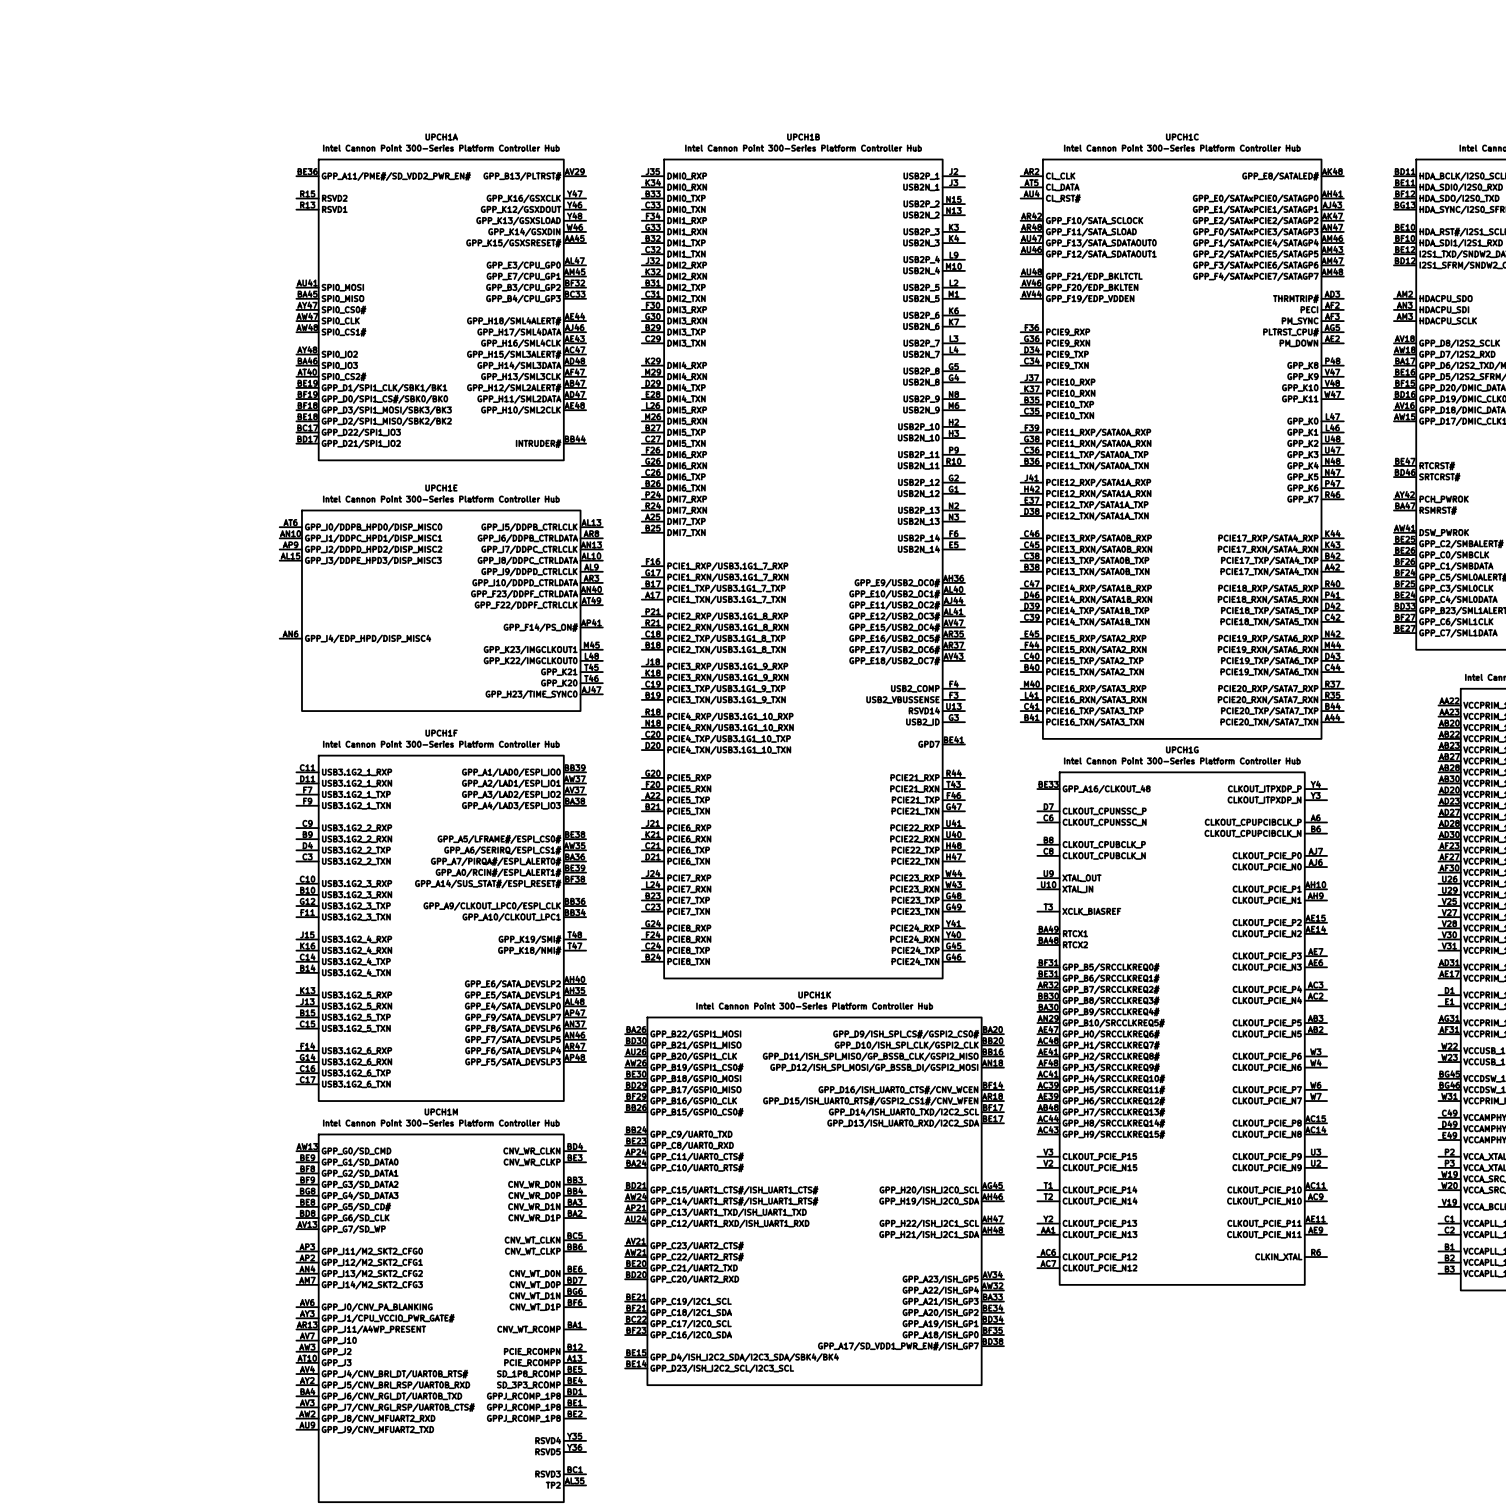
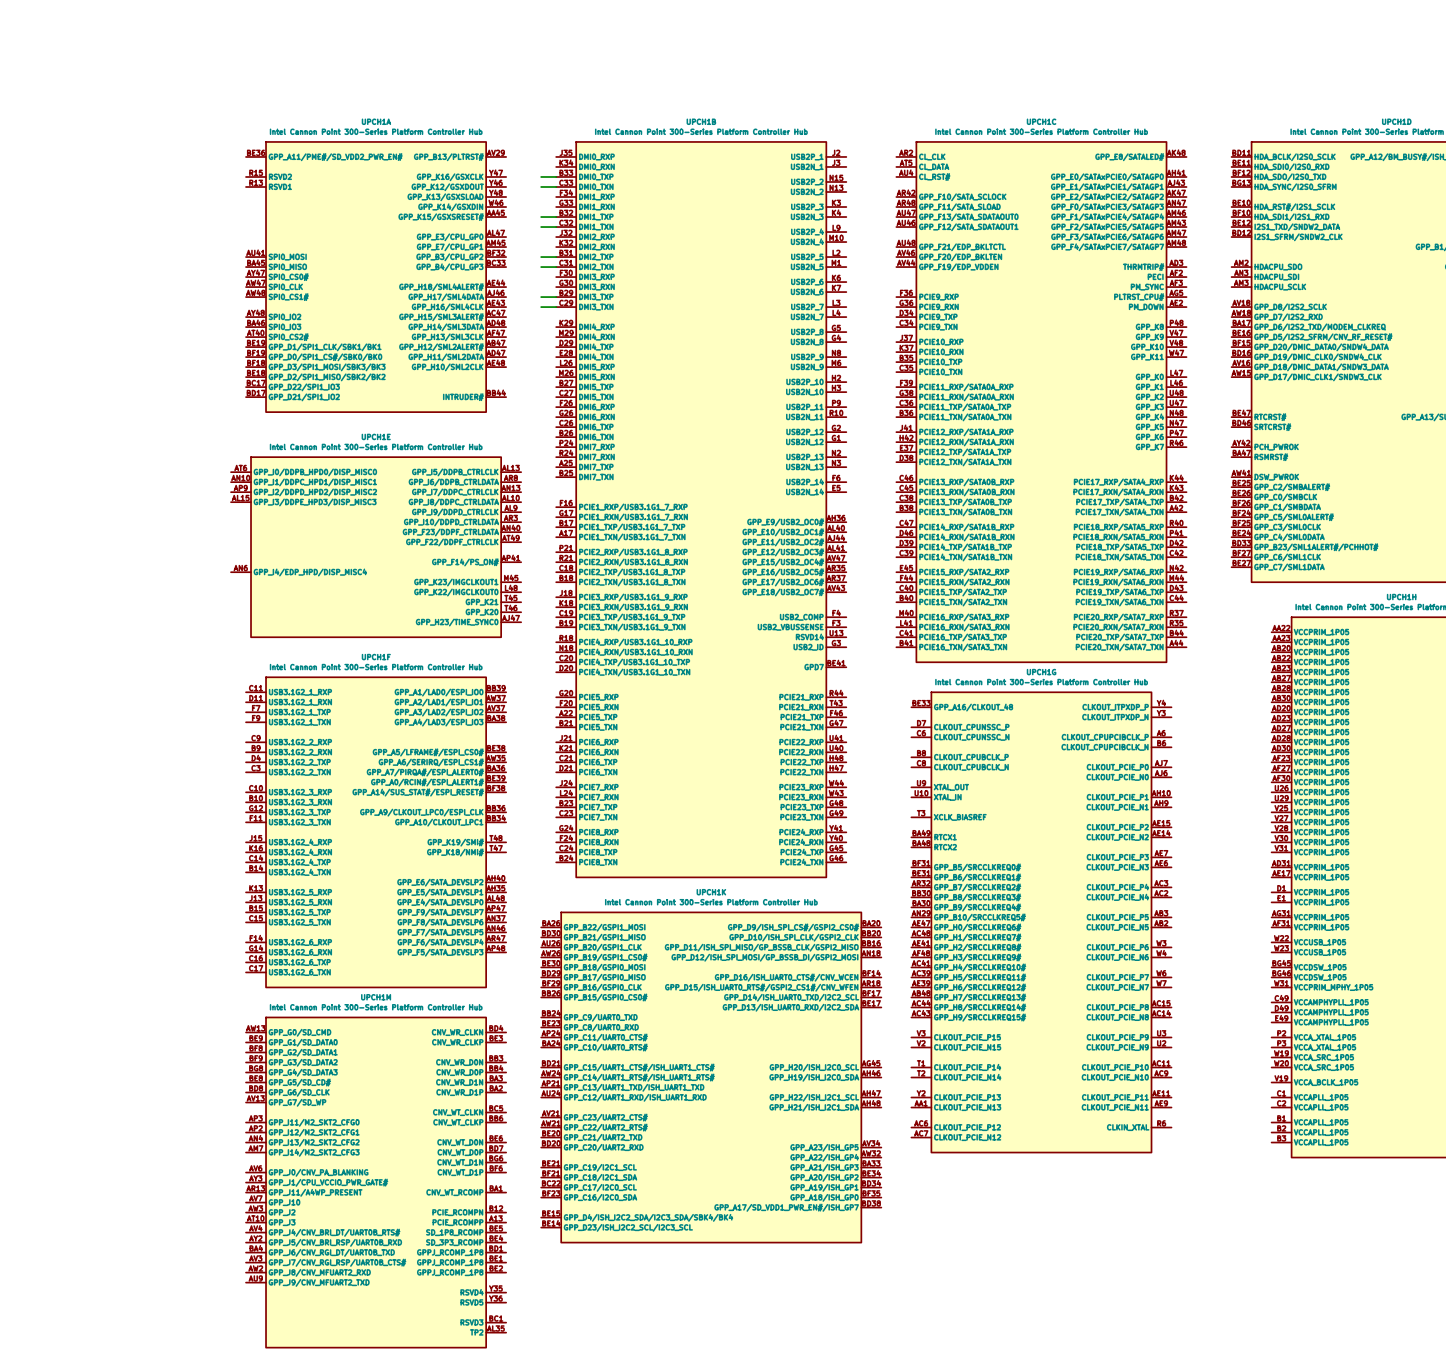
wire: none -> (541, 176) (556, 176)
wire: none -> (541, 186) (556, 186)
wire: none -> (541, 217) (556, 217)
wire: none -> (541, 227) (556, 227)
wire: none -> (541, 257) (556, 257)
wire: none -> (541, 267) (556, 267)
wire: none -> (541, 297) (556, 297)
wire: none -> (541, 307) (556, 307)

